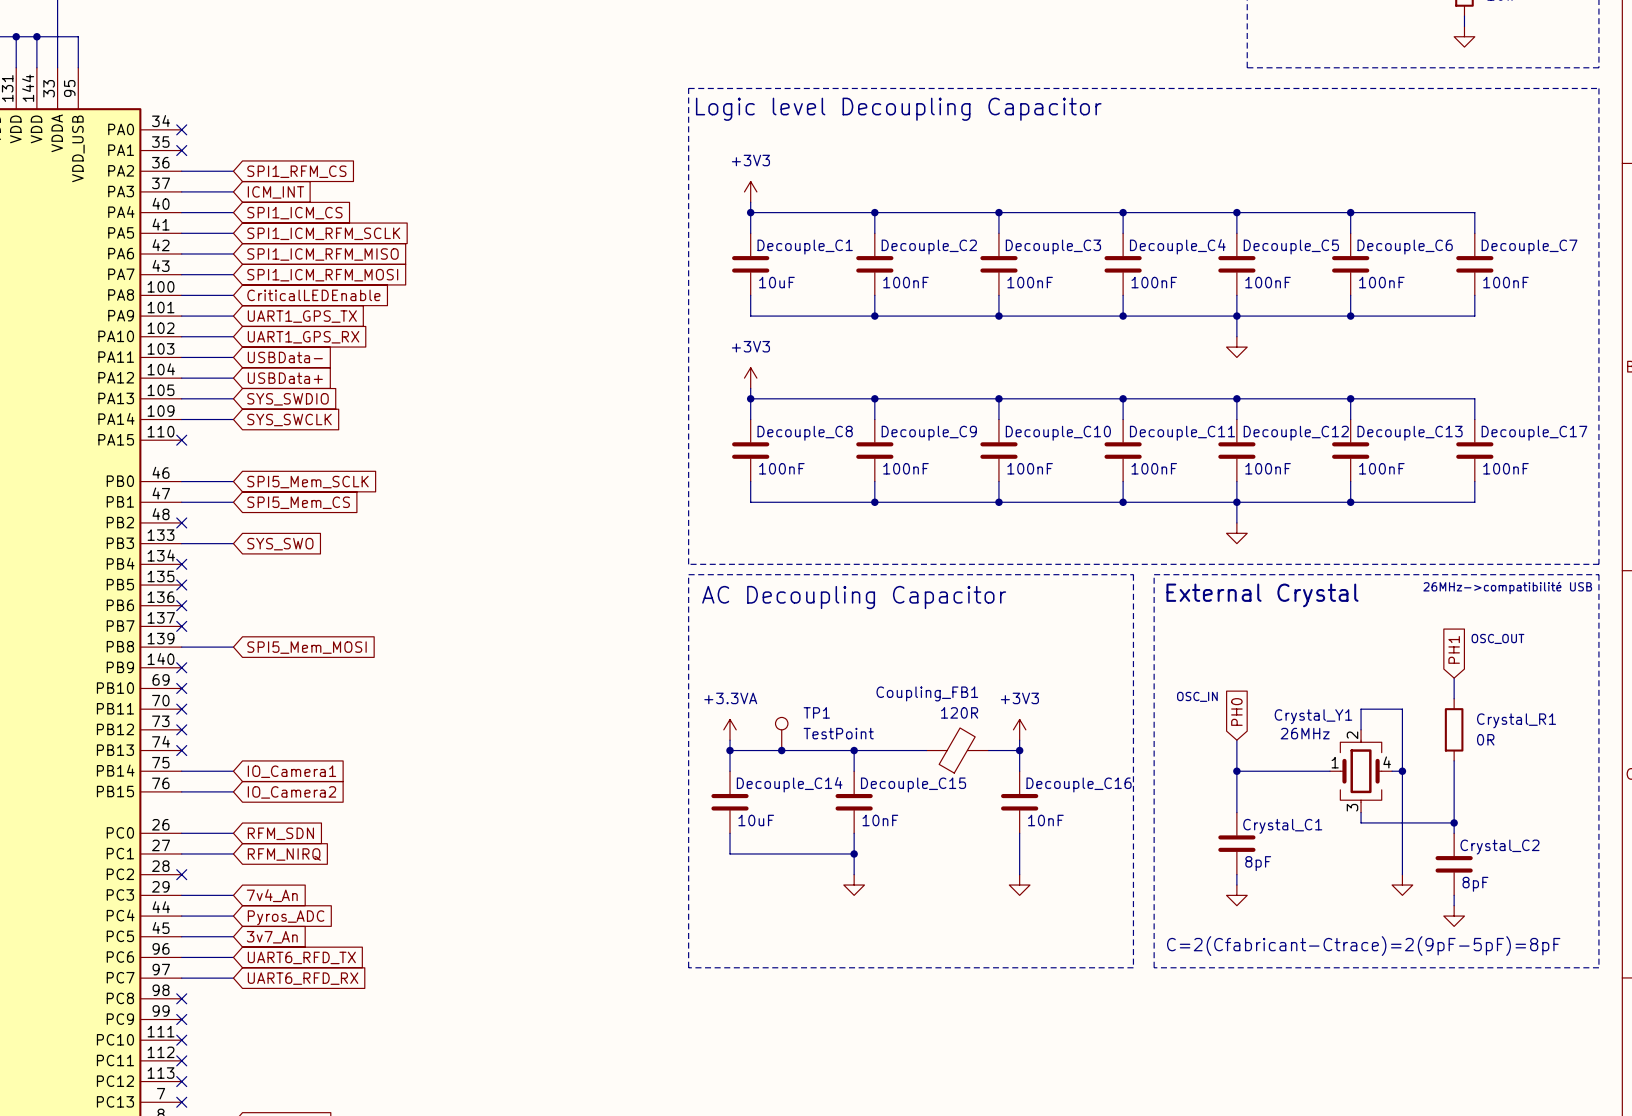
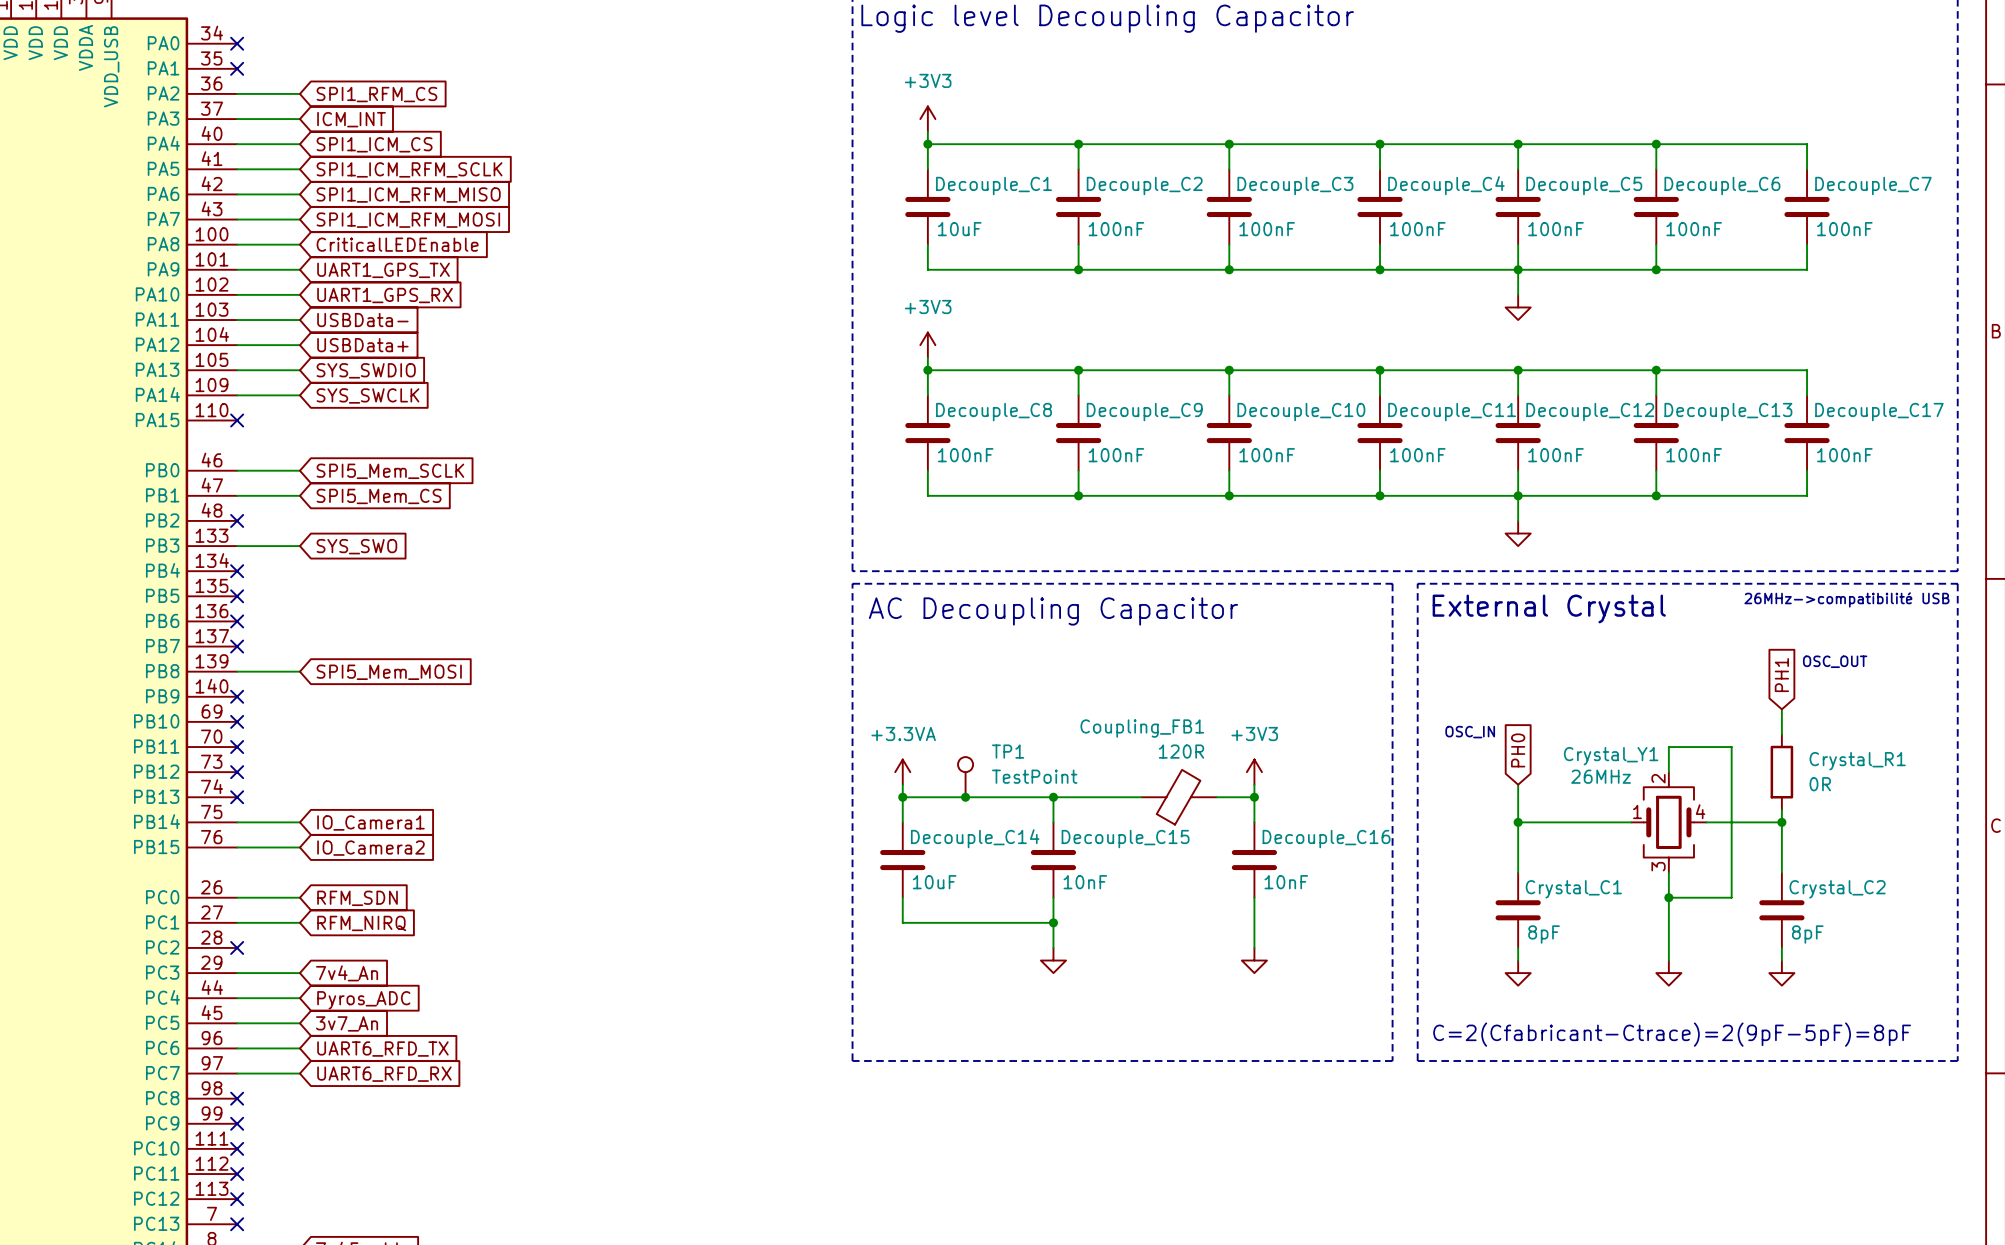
wire: (1402, 709) (1402, 874) -> (1719, 747) (1731, 747) (1731, 897) (1668, 897)
wire: none -> (1719, 822) (1781, 822)
junction: (1402, 771) -> none
junction: none -> (1781, 822)
wire: (1361, 822) (1454, 822) -> (1668, 885) (1668, 960)
junction: (1454, 822) -> none
junction: none -> (1668, 897)
Crystal_C2 position: (1454, 864) -> (1781, 910)
power symbol: (1402, 885) -> none
power symbol: none -> (1668, 973)
power symbol position: (1454, 916) -> (1781, 973)

